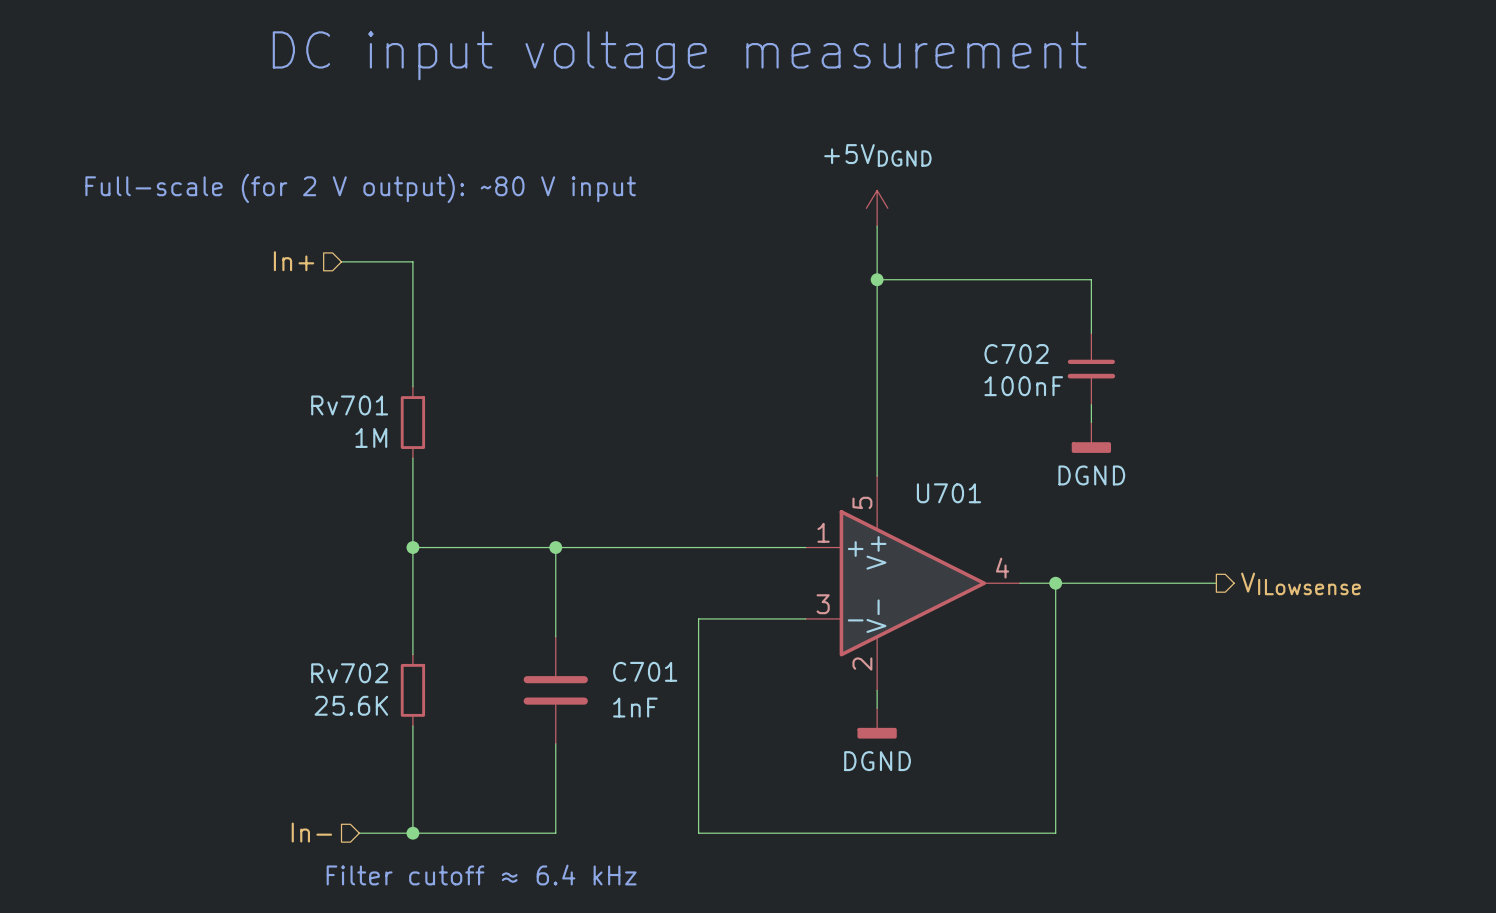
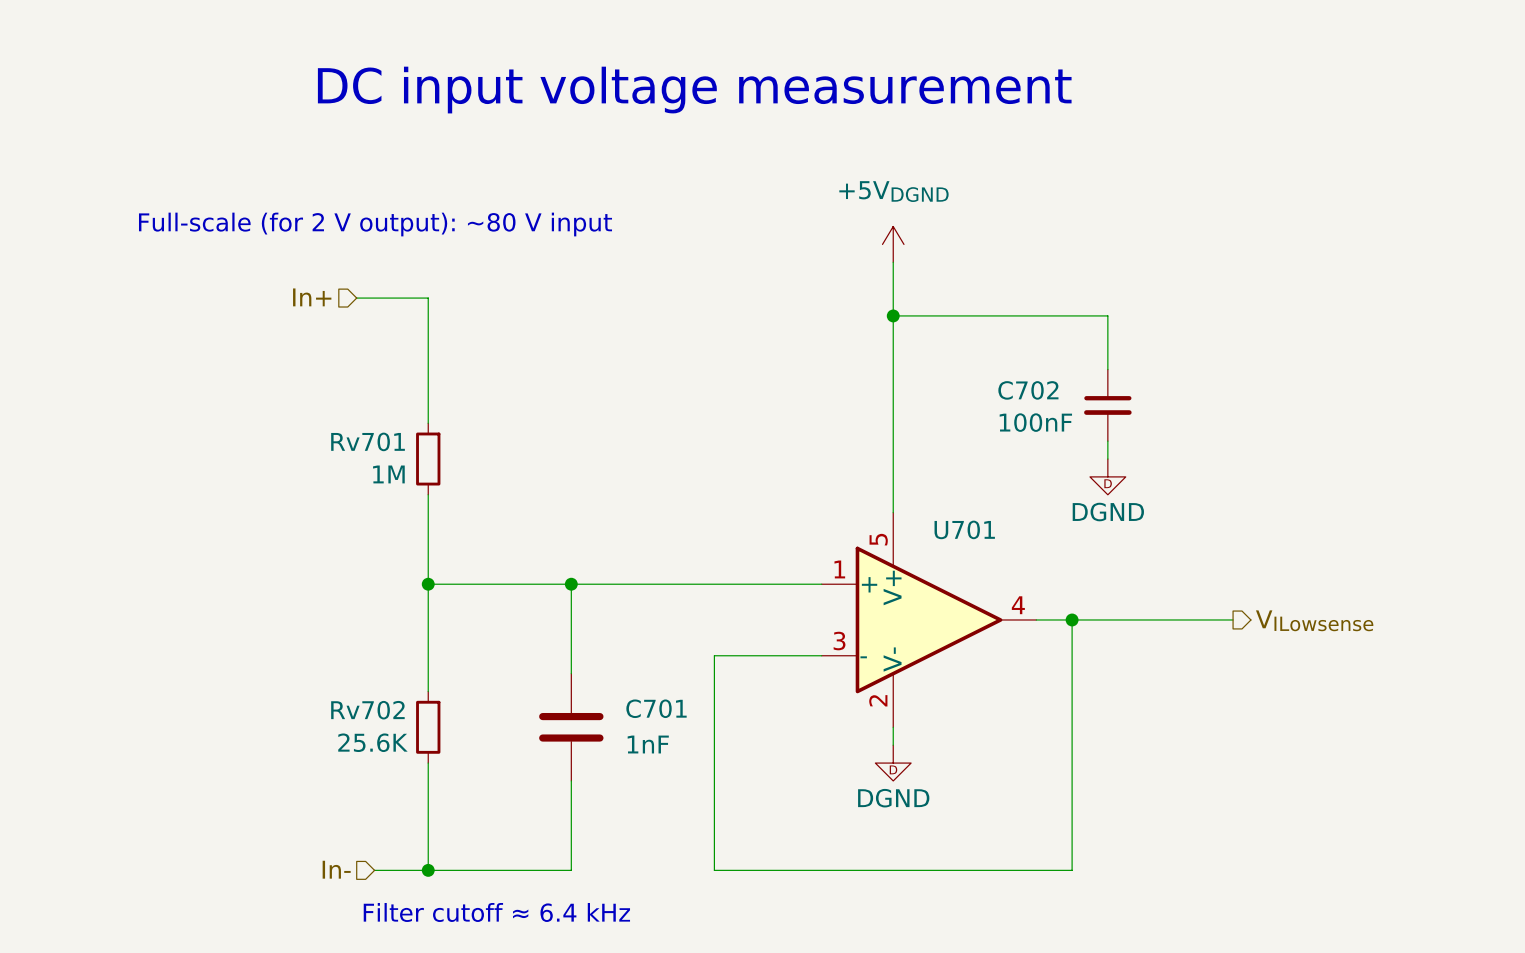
power symbol shape: [1071, 422, 1112, 453] -> [1089, 459, 1126, 495]
power symbol shape: [857, 708, 897, 739] -> [875, 745, 912, 781]

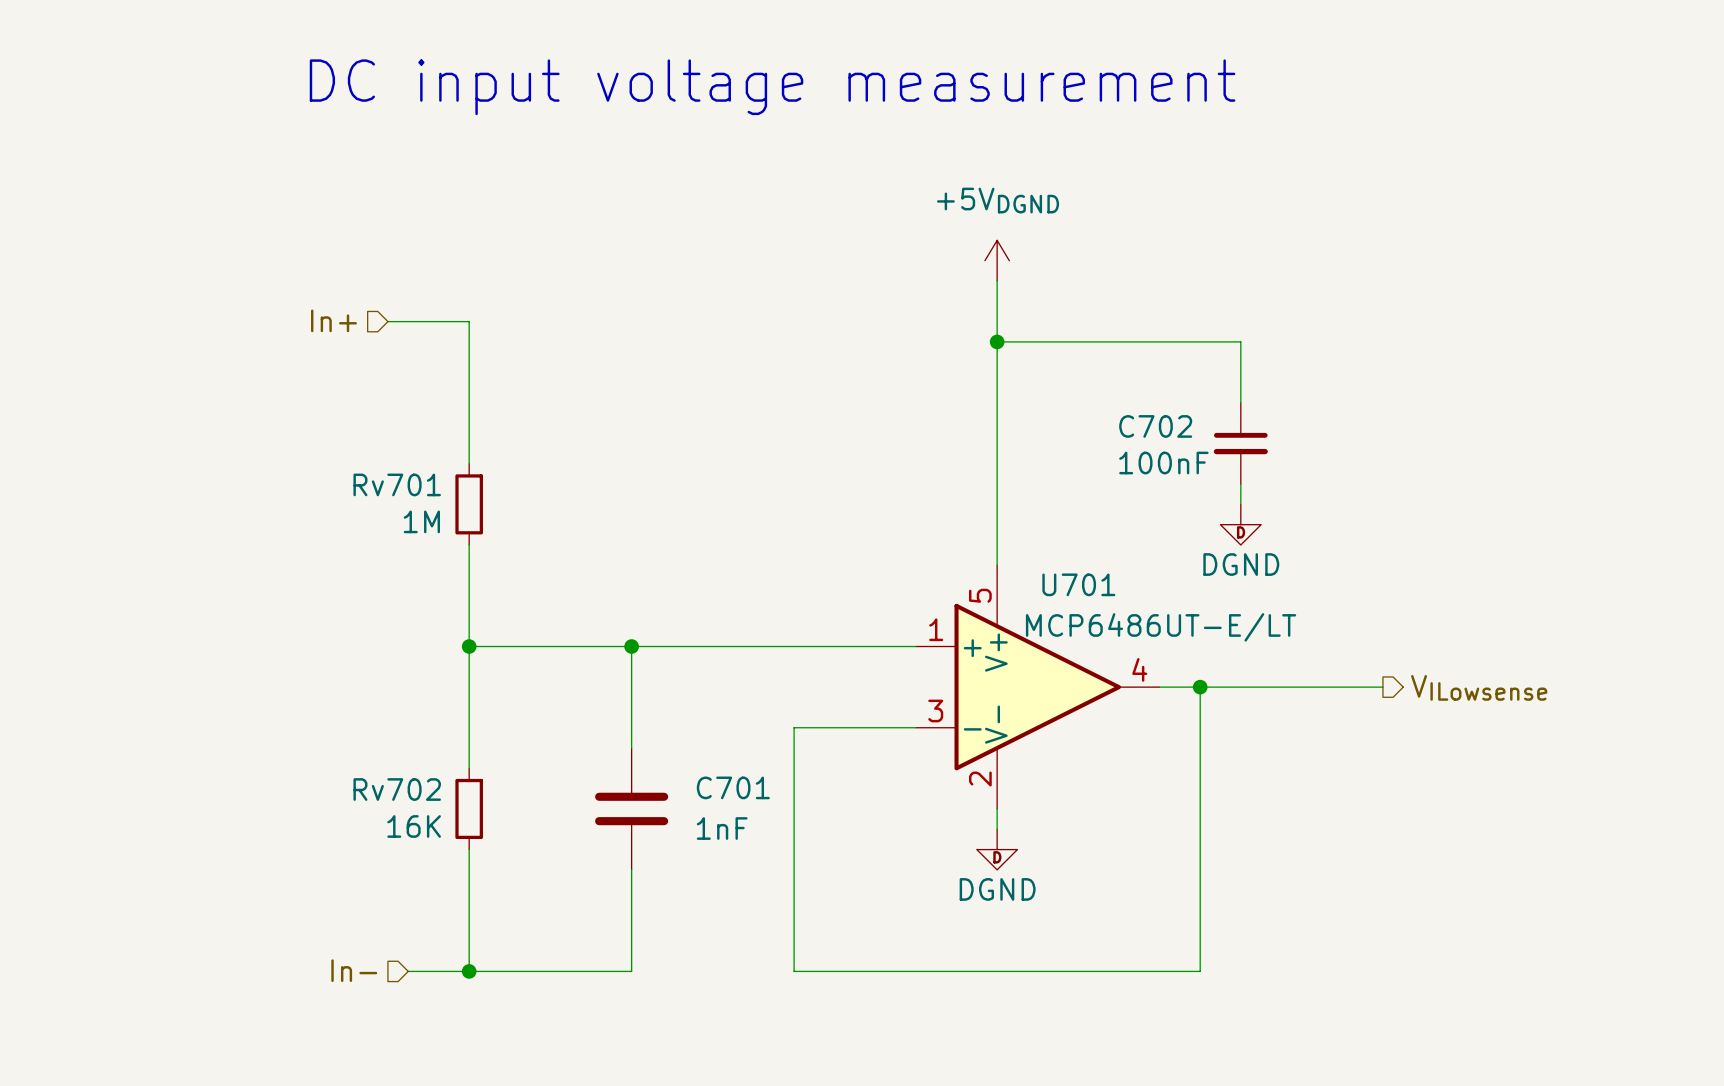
text: Full-scale (for 2 V output): ~80 V input (375, 224) -> none
U701 text: none -> MCP6486UT-E/LT (1161, 627)
Rv702 value: 25.6K (372, 742) -> 16K (414, 826)
text: Filter cutoff ≈ 6.4 kHz (496, 912) -> none

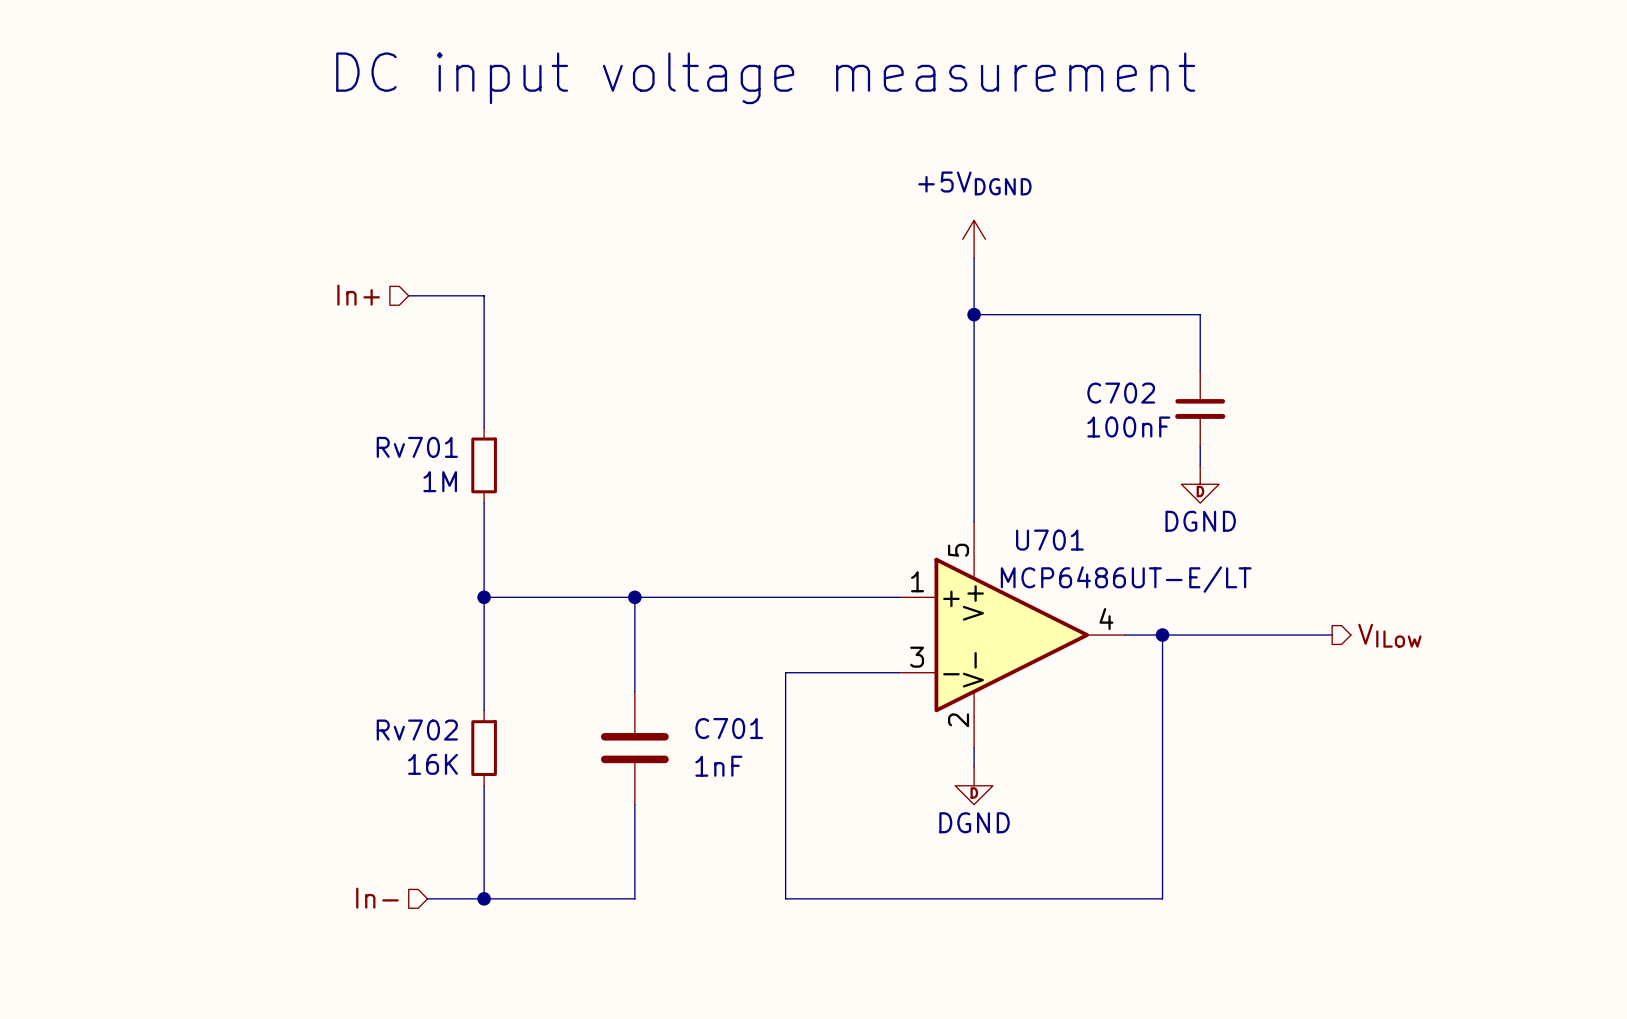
hierarchical label: VILowsense (1479, 687) -> VILow (1389, 635)

